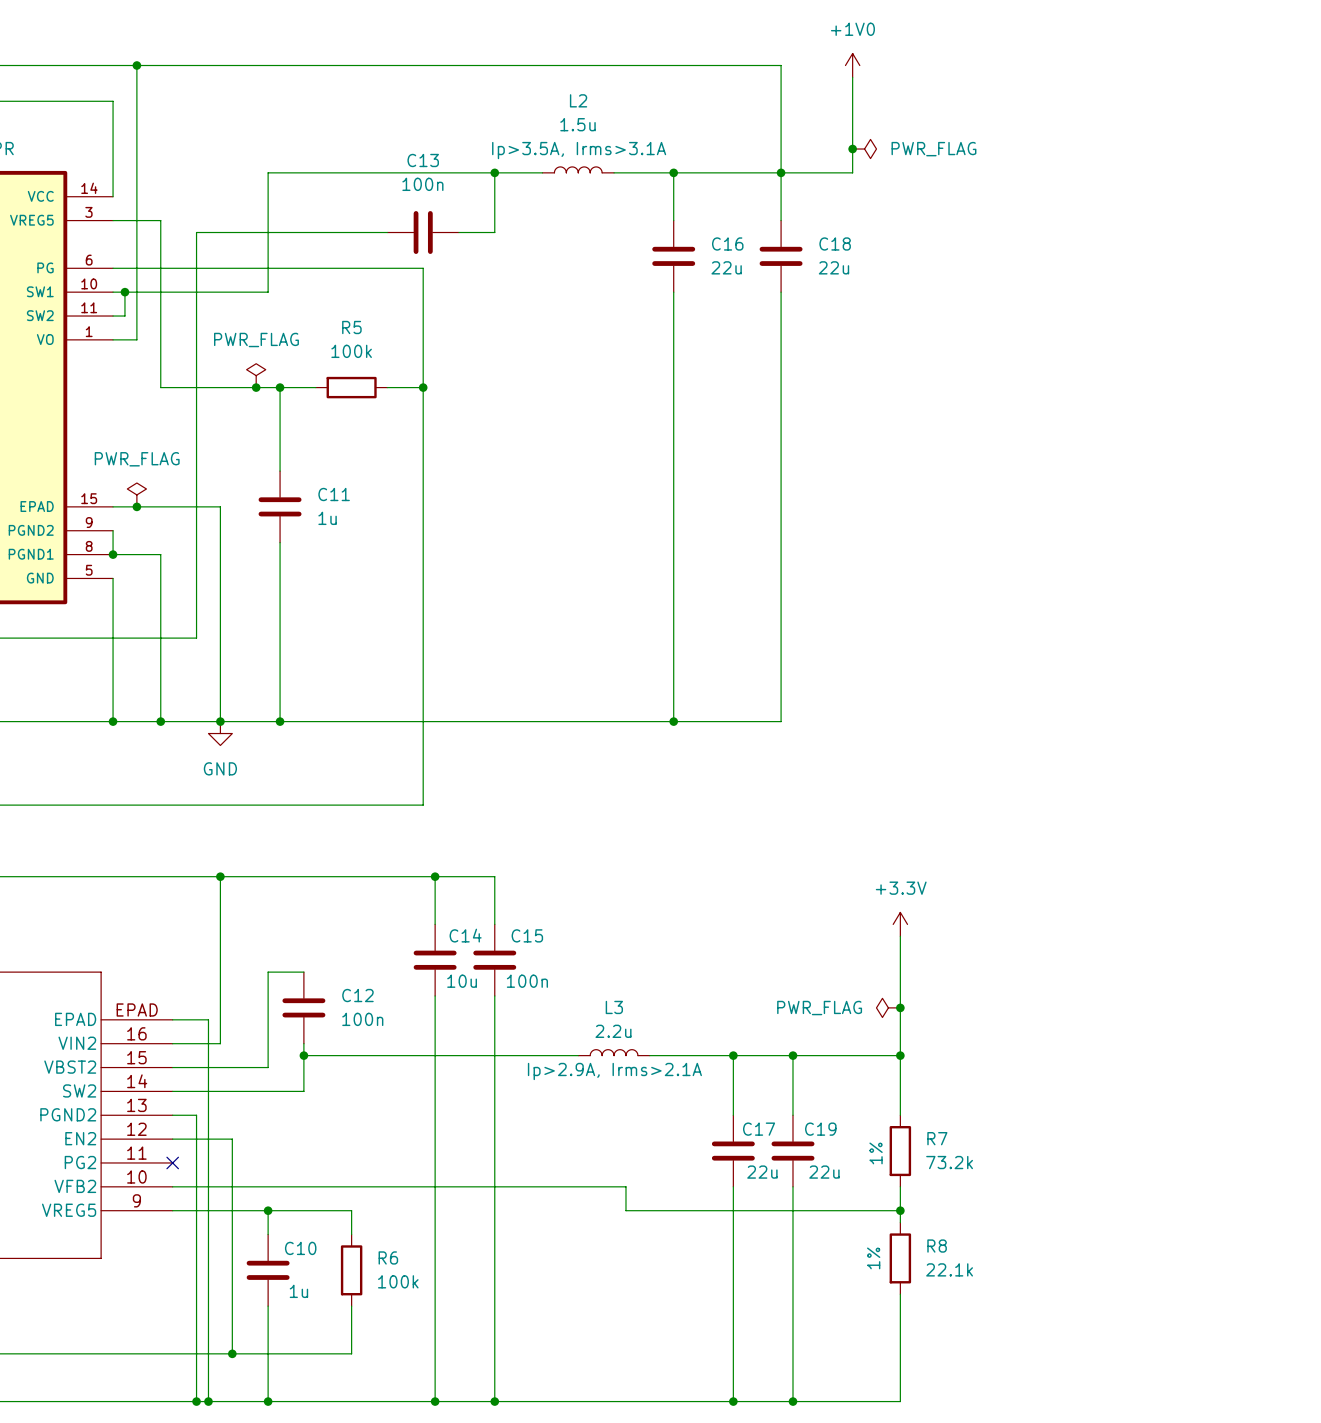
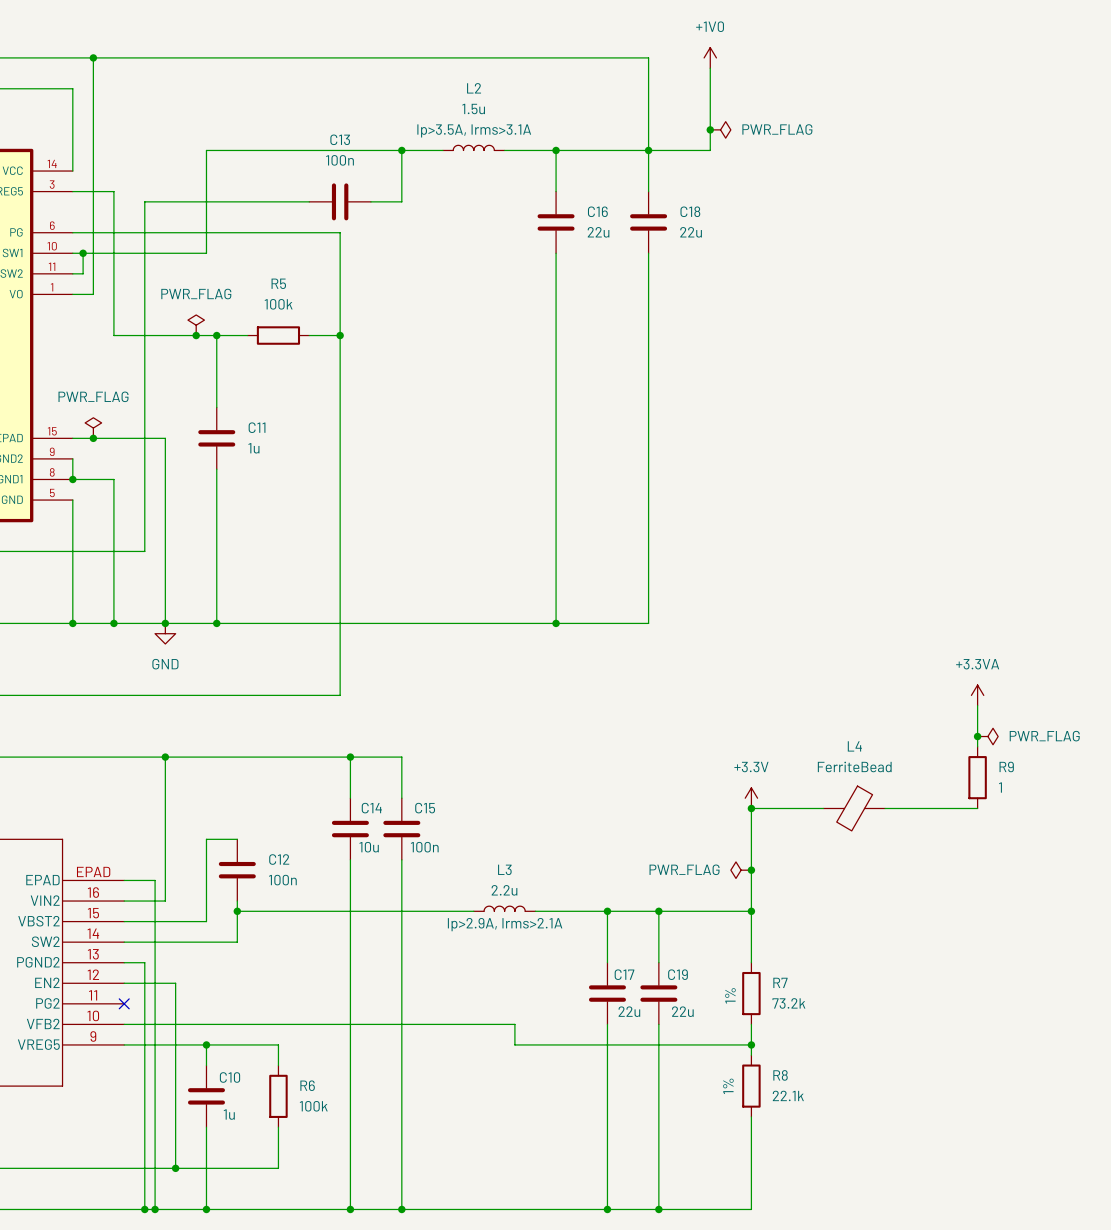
power symbol: none -> +3.3VA (977, 695)
wire: none -> (977, 705) (977, 746)
junction: none -> (977, 736)
power symbol: none -> PWR_FLAG (987, 736)
R9: none -> 1 (977, 777)
wire: none -> (751, 808) (823, 808)
junction: none -> (751, 808)
L4: none -> FerriteBead (854, 808)
wire: none -> (885, 808) (977, 808)

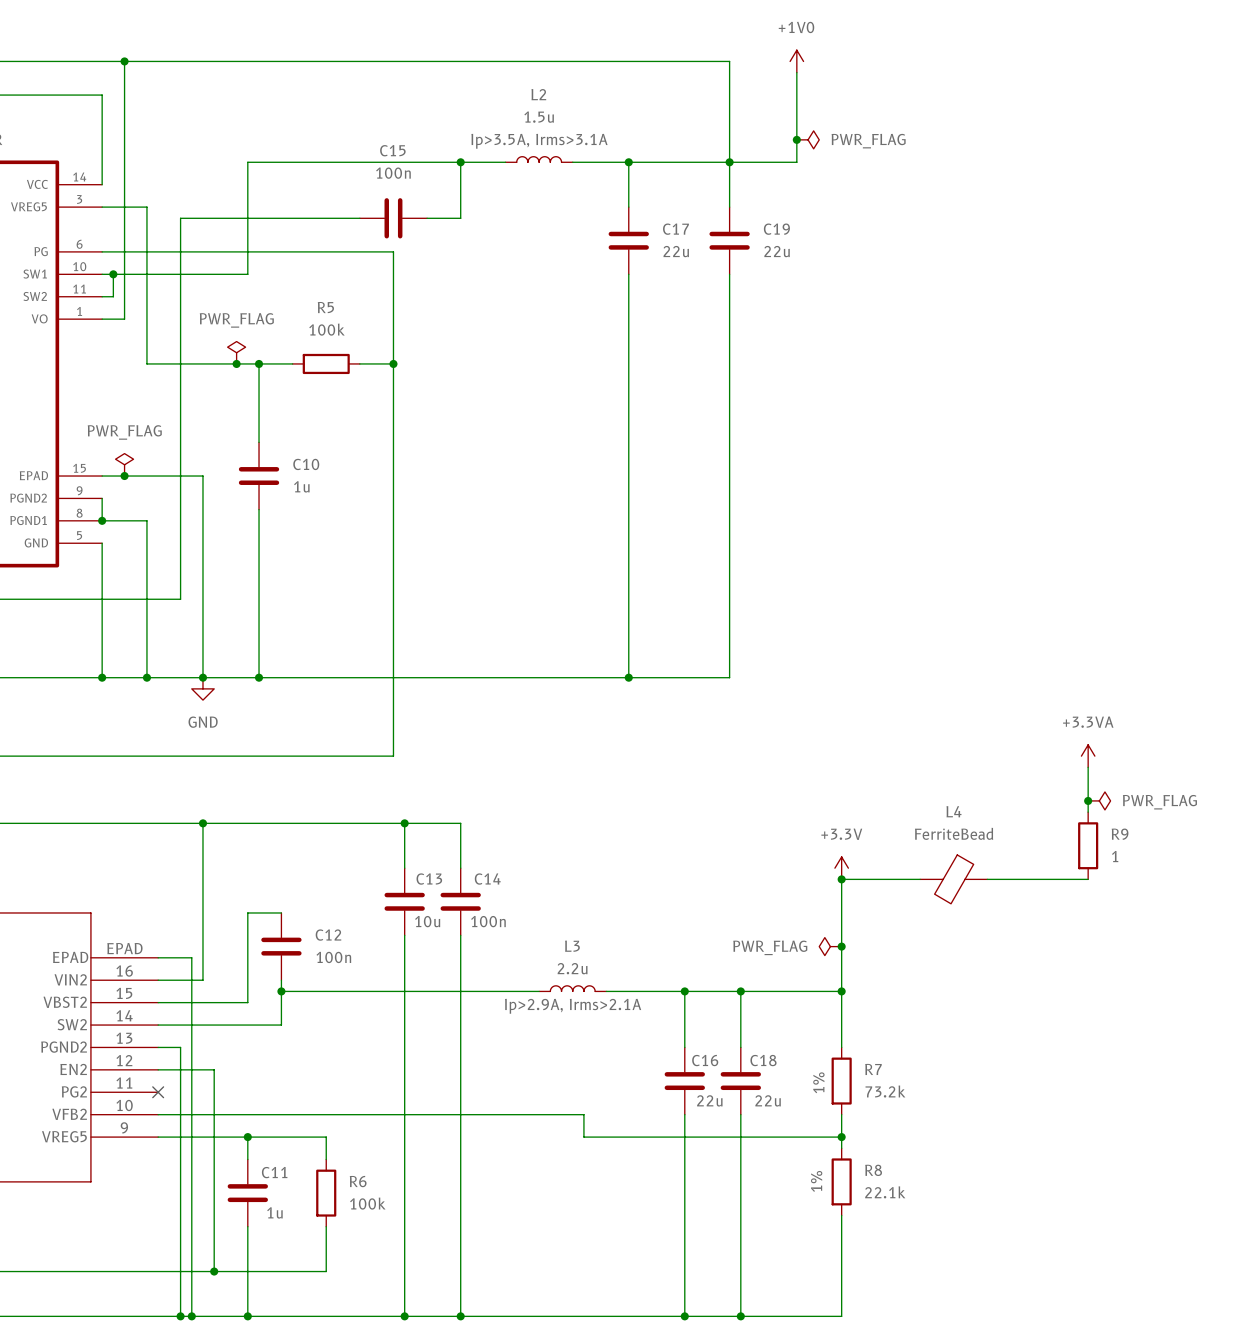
C13 name: C13 (340, 139) -> C15 (392, 150)
C16 name: C16 (597, 211) -> C17 (675, 229)
C18 name: C18 (690, 211) -> C19 (776, 229)
C11 name: C11 (257, 427) -> C10 (306, 464)
C14 name: C14 (371, 808) -> C13 (429, 879)
C15 name: C15 (425, 808) -> C14 (487, 879)
C17 name: C17 (624, 974) -> C16 (705, 1060)
C19 name: C19 (678, 974) -> C18 (763, 1060)
C10 name: C10 (230, 1077) -> C11 (274, 1172)

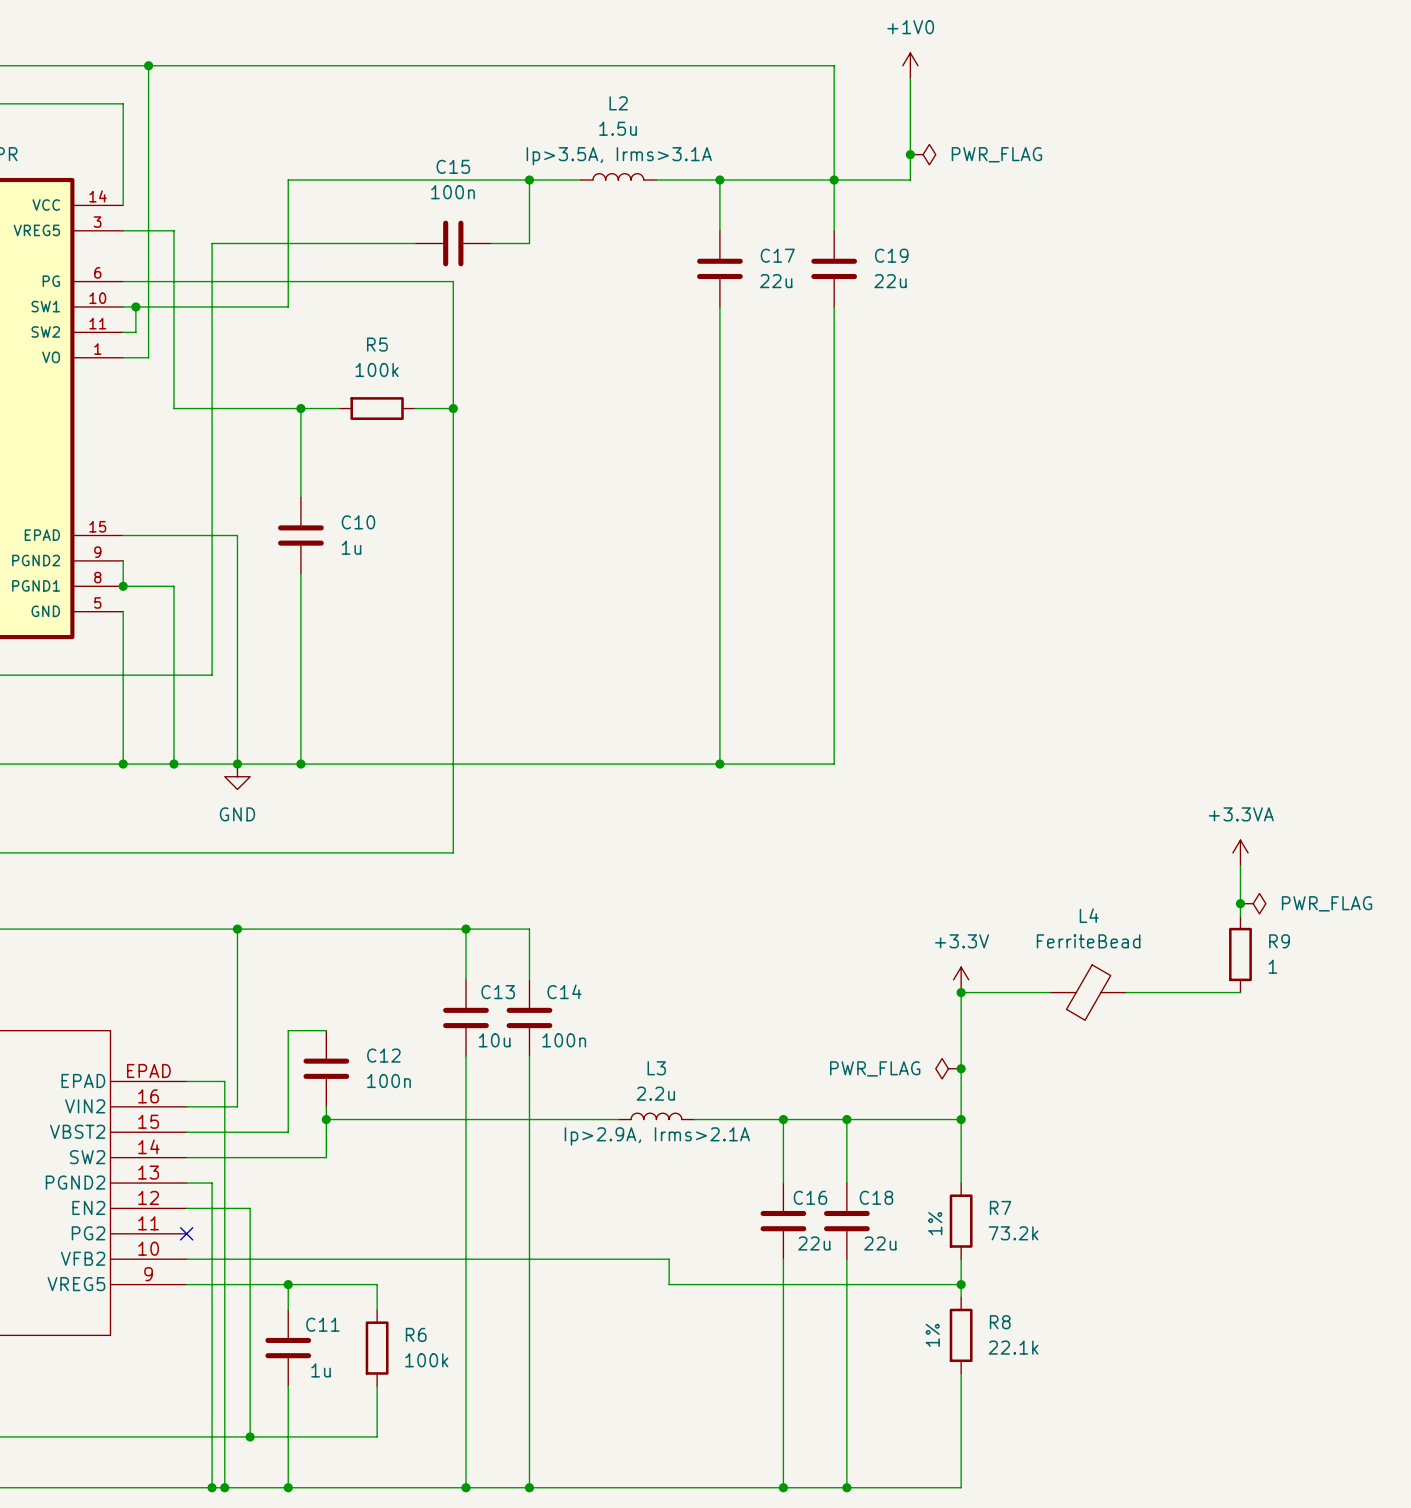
power symbol: PWR_FLAG (236, 352) -> none
junction: (236, 363) -> none
power symbol: PWR_FLAG (124, 464) -> none
junction: (124, 476) -> none

